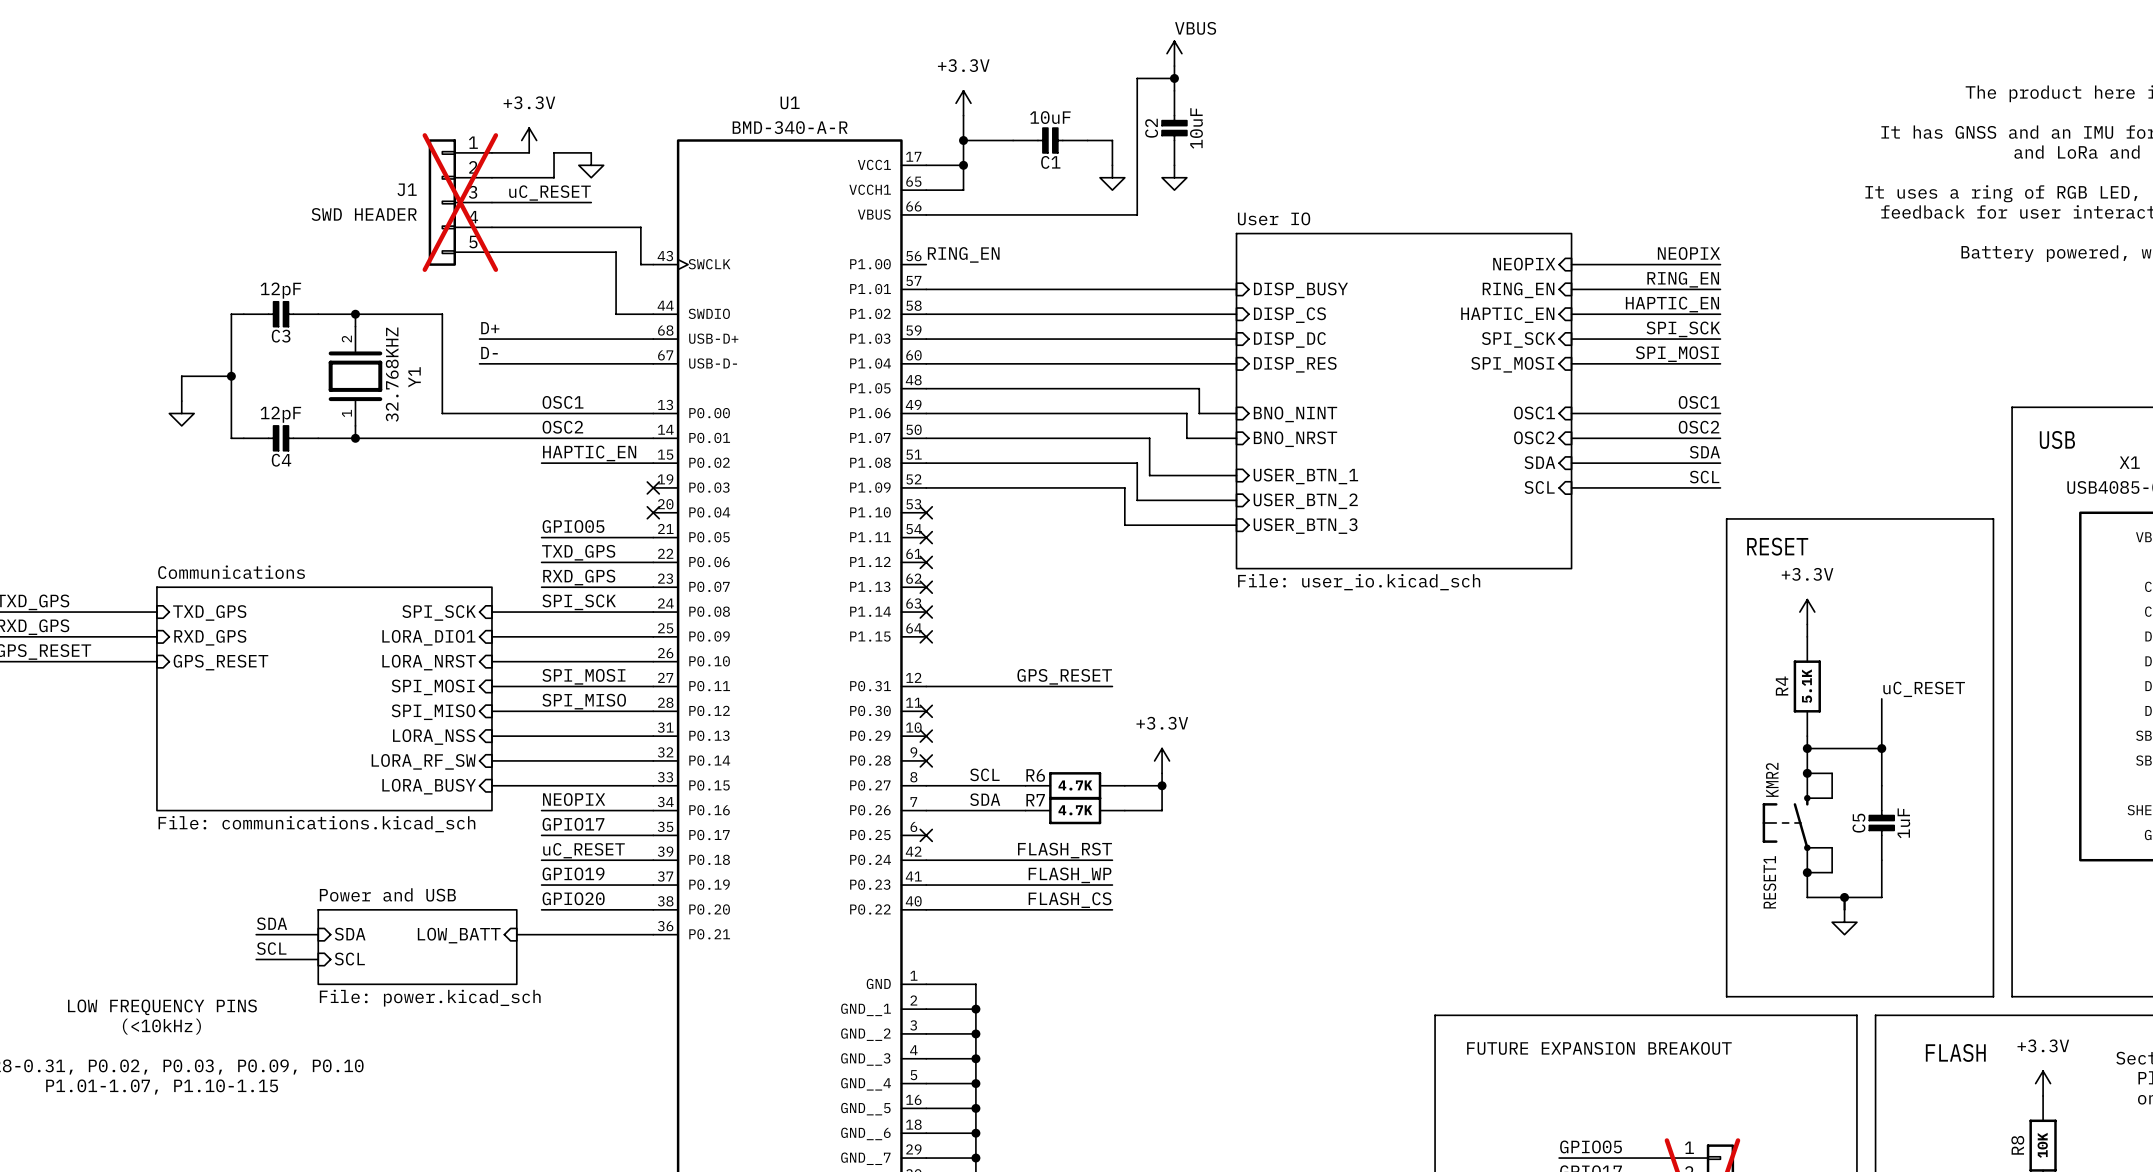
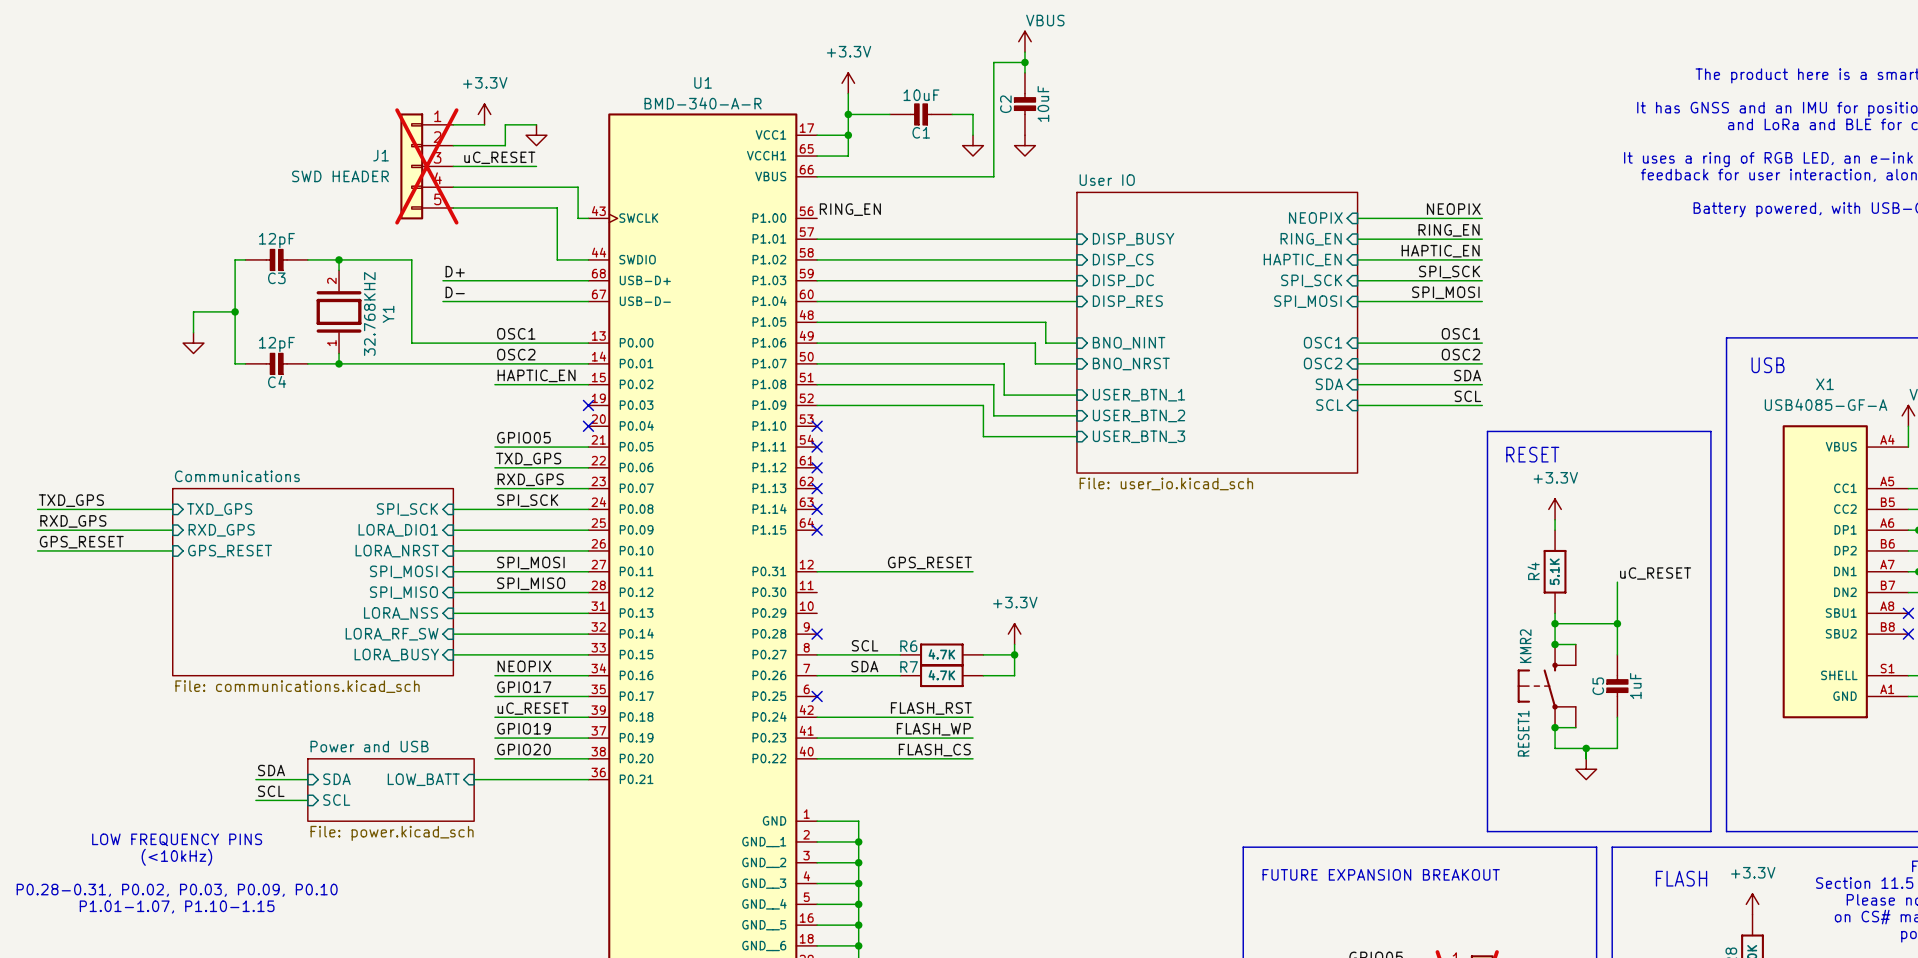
no-connect mark: (926, 711) -> none
no-connect mark: (926, 736) -> none

